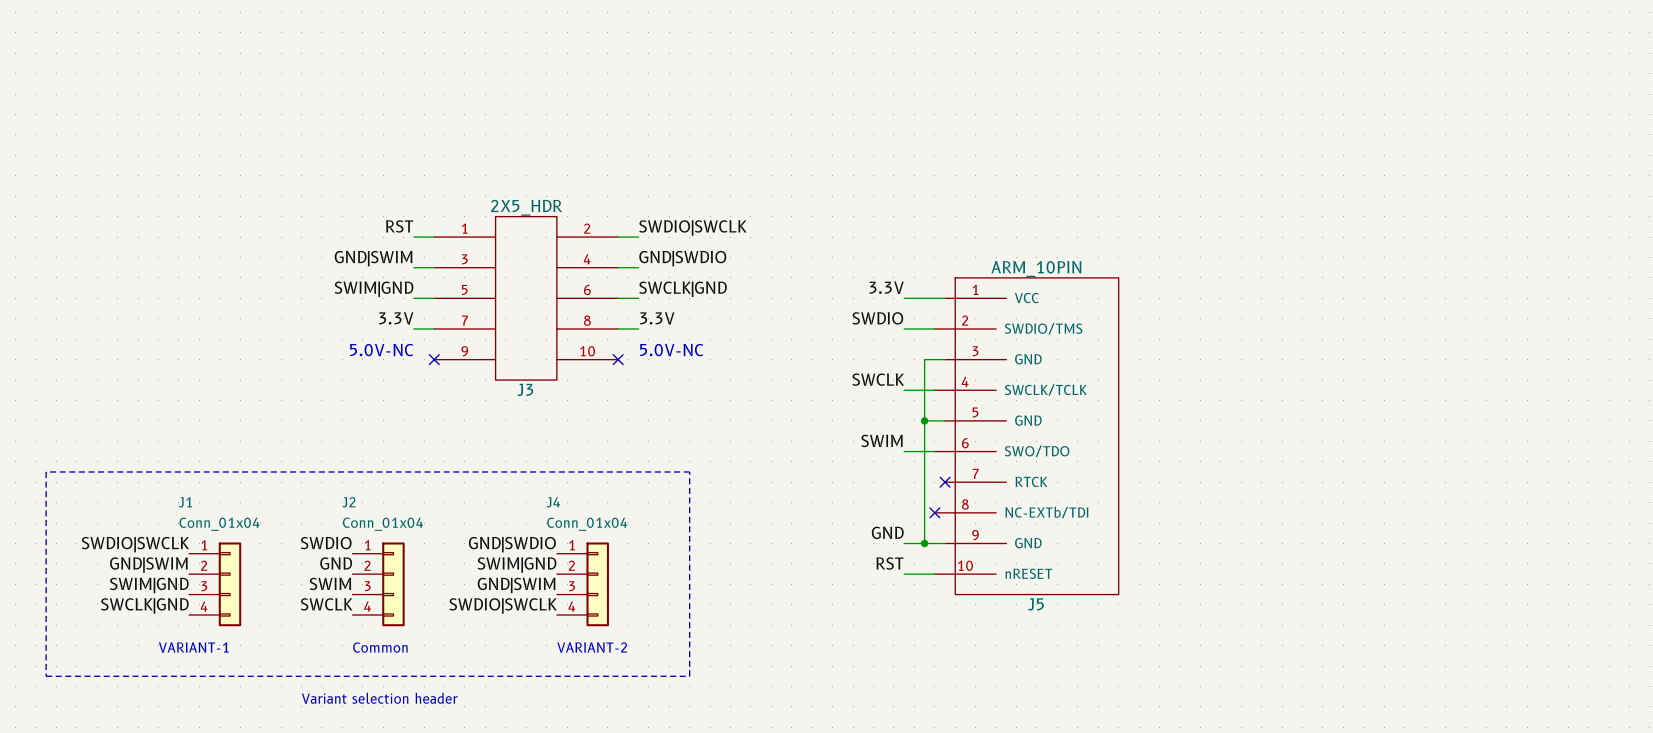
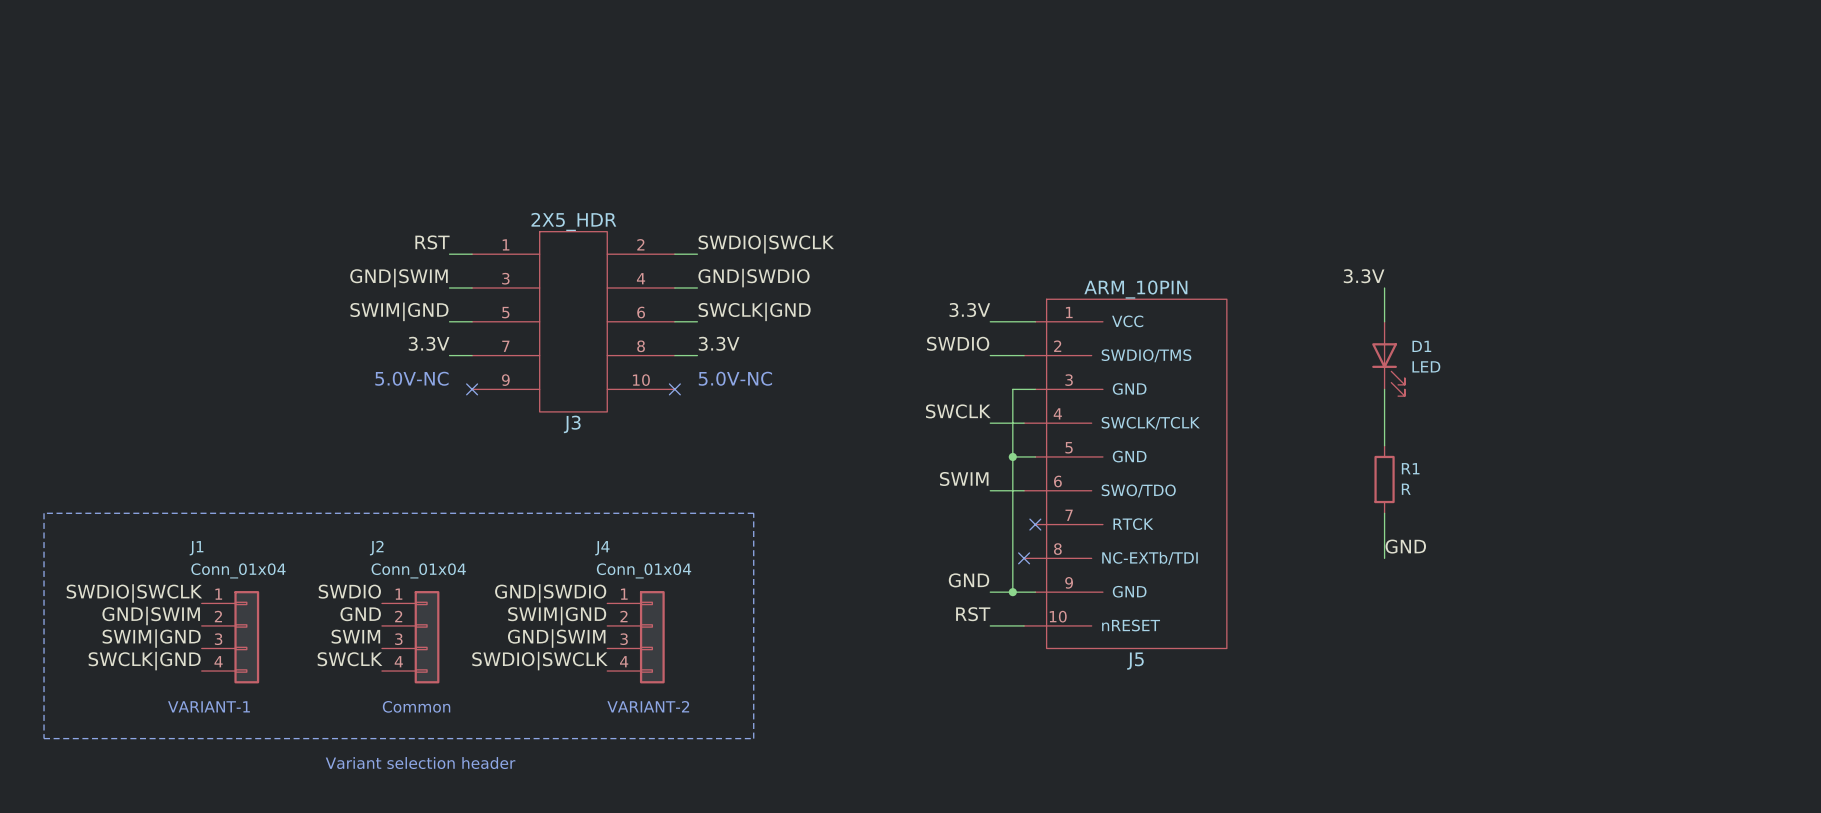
label: none -> 3.3V (1364, 276)
wire: none -> (1384, 287) (1384, 321)
D1: none -> LED (1388, 358)
wire: none -> (1384, 389) (1384, 445)
R1: none -> R (1384, 479)
wire: none -> (1384, 513) (1384, 558)
label: none -> GND (1405, 546)

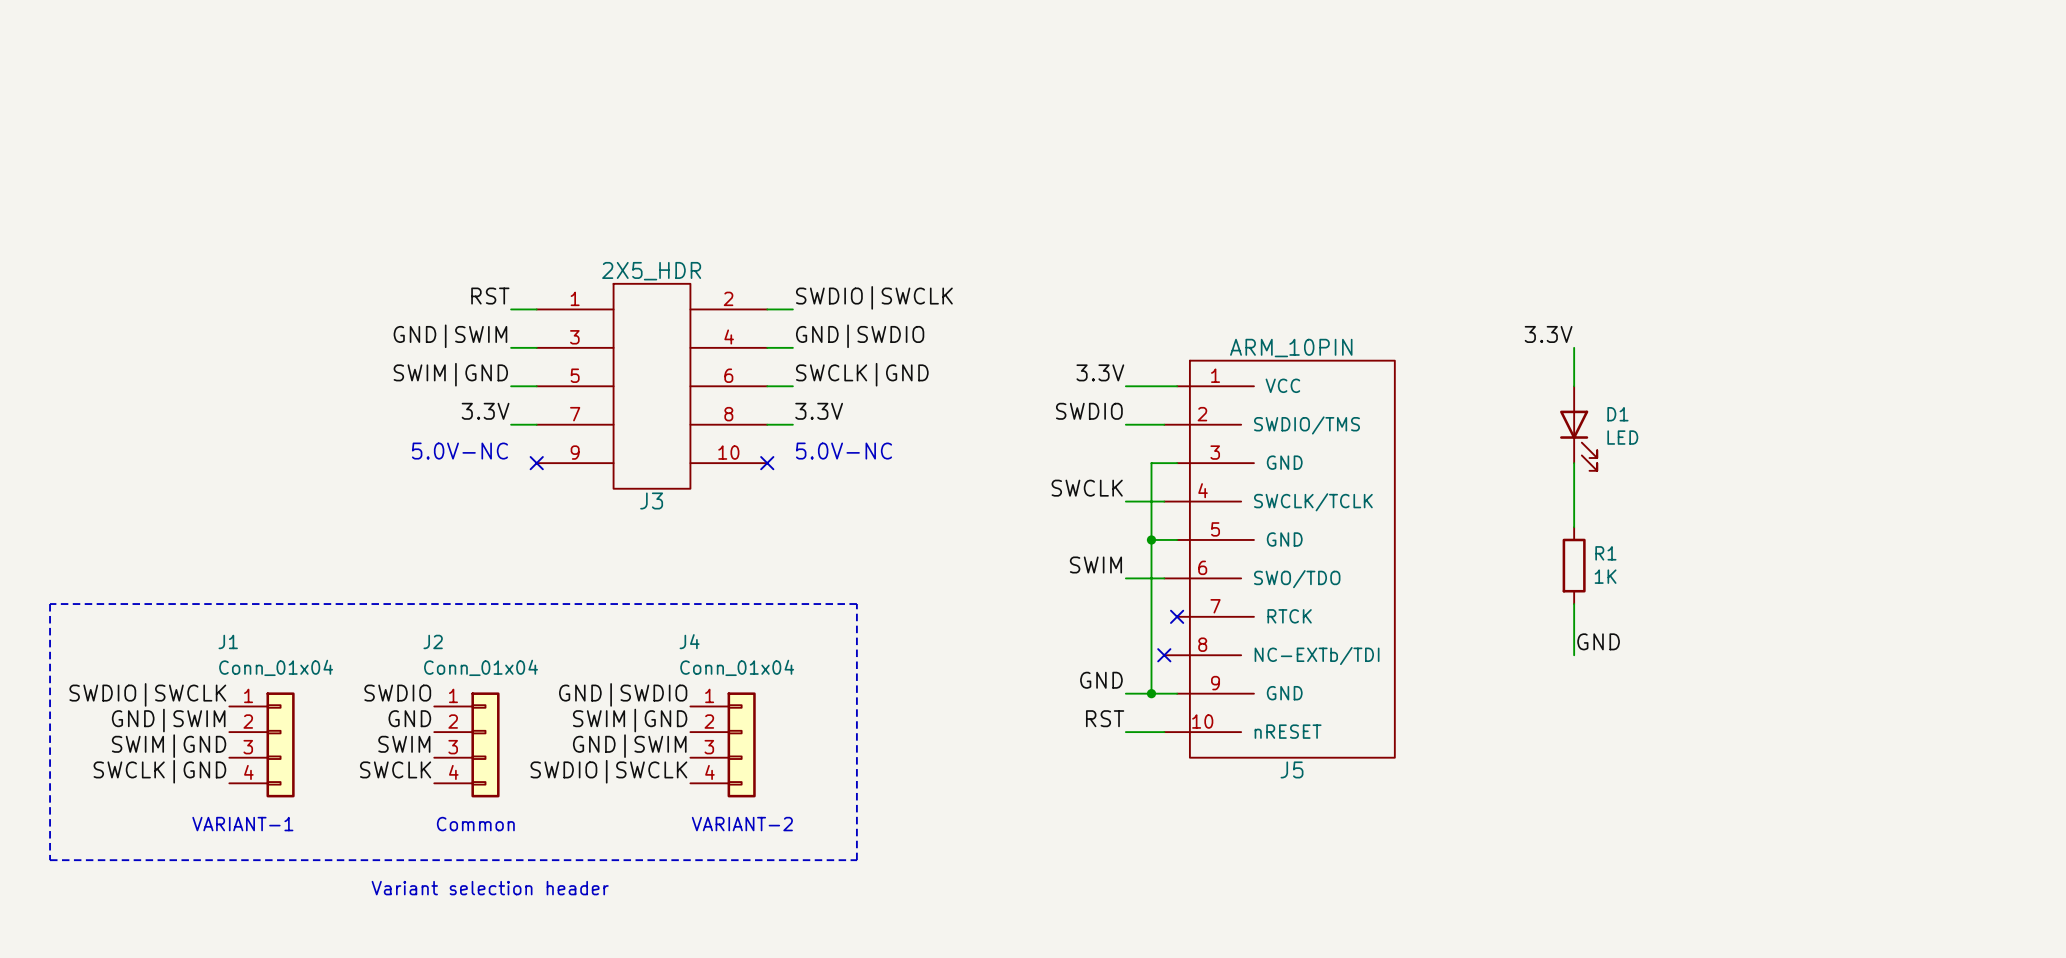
R1 value: R (1406, 489) -> 1K (1605, 576)

